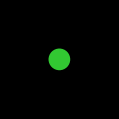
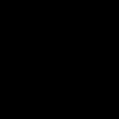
junction: (59, 59) -> none

